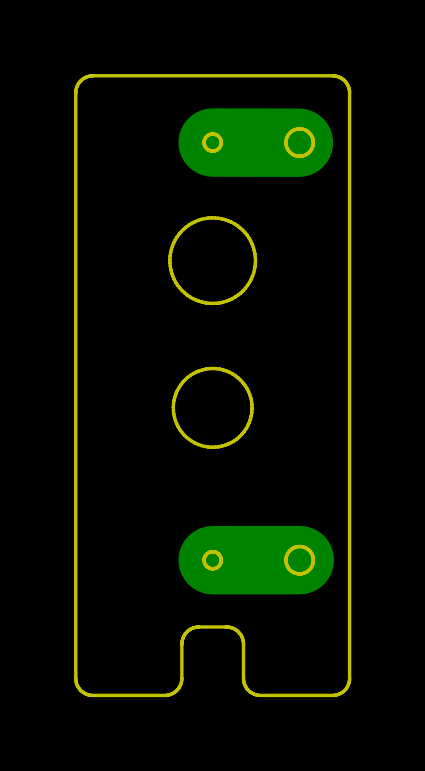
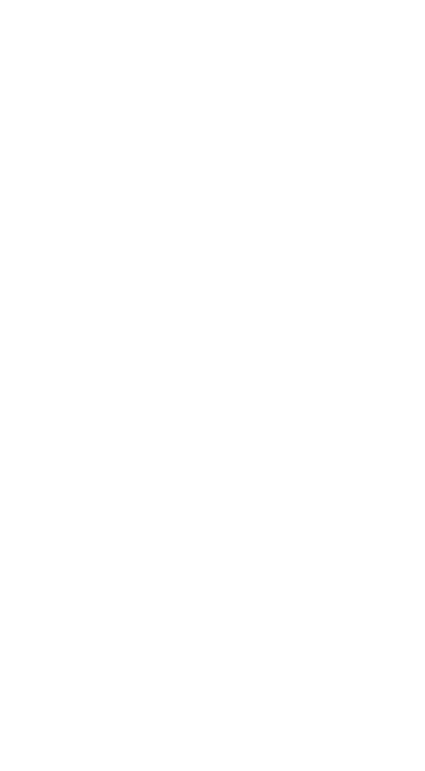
board edge: (92, 75) (80, 80) (75, 91) (77, 684) (82, 691) (91, 695) (171, 694) (176, 690) (181, 683) (181, 642) (185, 633) (195, 627) (226, 626) (235, 629) (242, 637) (243, 681) (251, 692) (258, 695) (339, 694) (345, 689) (349, 680) (348, 86) (342, 78) (332, 75) (92, 75) -> none
board edge: (298, 128) (308, 131) (313, 141) (310, 151) (300, 156) (290, 153) (286, 143) (289, 133) (298, 128) -> none
board edge: (211, 134) (218, 135) (221, 141) (219, 148) (213, 151) (207, 149) (204, 143) (206, 137) (211, 134) -> none
bottom track: (212, 142) (298, 142) -> none
board edge: (211, 217) (228, 220) (242, 230) (252, 244) (255, 257) (253, 273) (245, 288) (232, 298) (216, 303) (199, 301) (184, 292) (174, 279) (169, 262) (172, 246) (181, 231) (195, 221) (211, 217) -> none
board edge: (213, 368) (229, 372) (240, 380) (248, 391) (252, 409) (247, 425) (239, 436) (228, 444) (211, 447) (198, 444) (184, 435) (176, 423) (173, 407) (177, 390) (185, 379) (199, 370) (213, 368) -> none
board edge: (298, 546) (308, 549) (313, 558) (311, 567) (300, 573) (290, 570) (286, 561) (289, 551) (298, 546) -> none
board edge: (211, 551) (218, 553) (221, 559) (219, 564) (214, 568) (207, 567) (204, 561) (206, 554) (211, 551) -> none
bottom track: (212, 560) (299, 560) -> none

